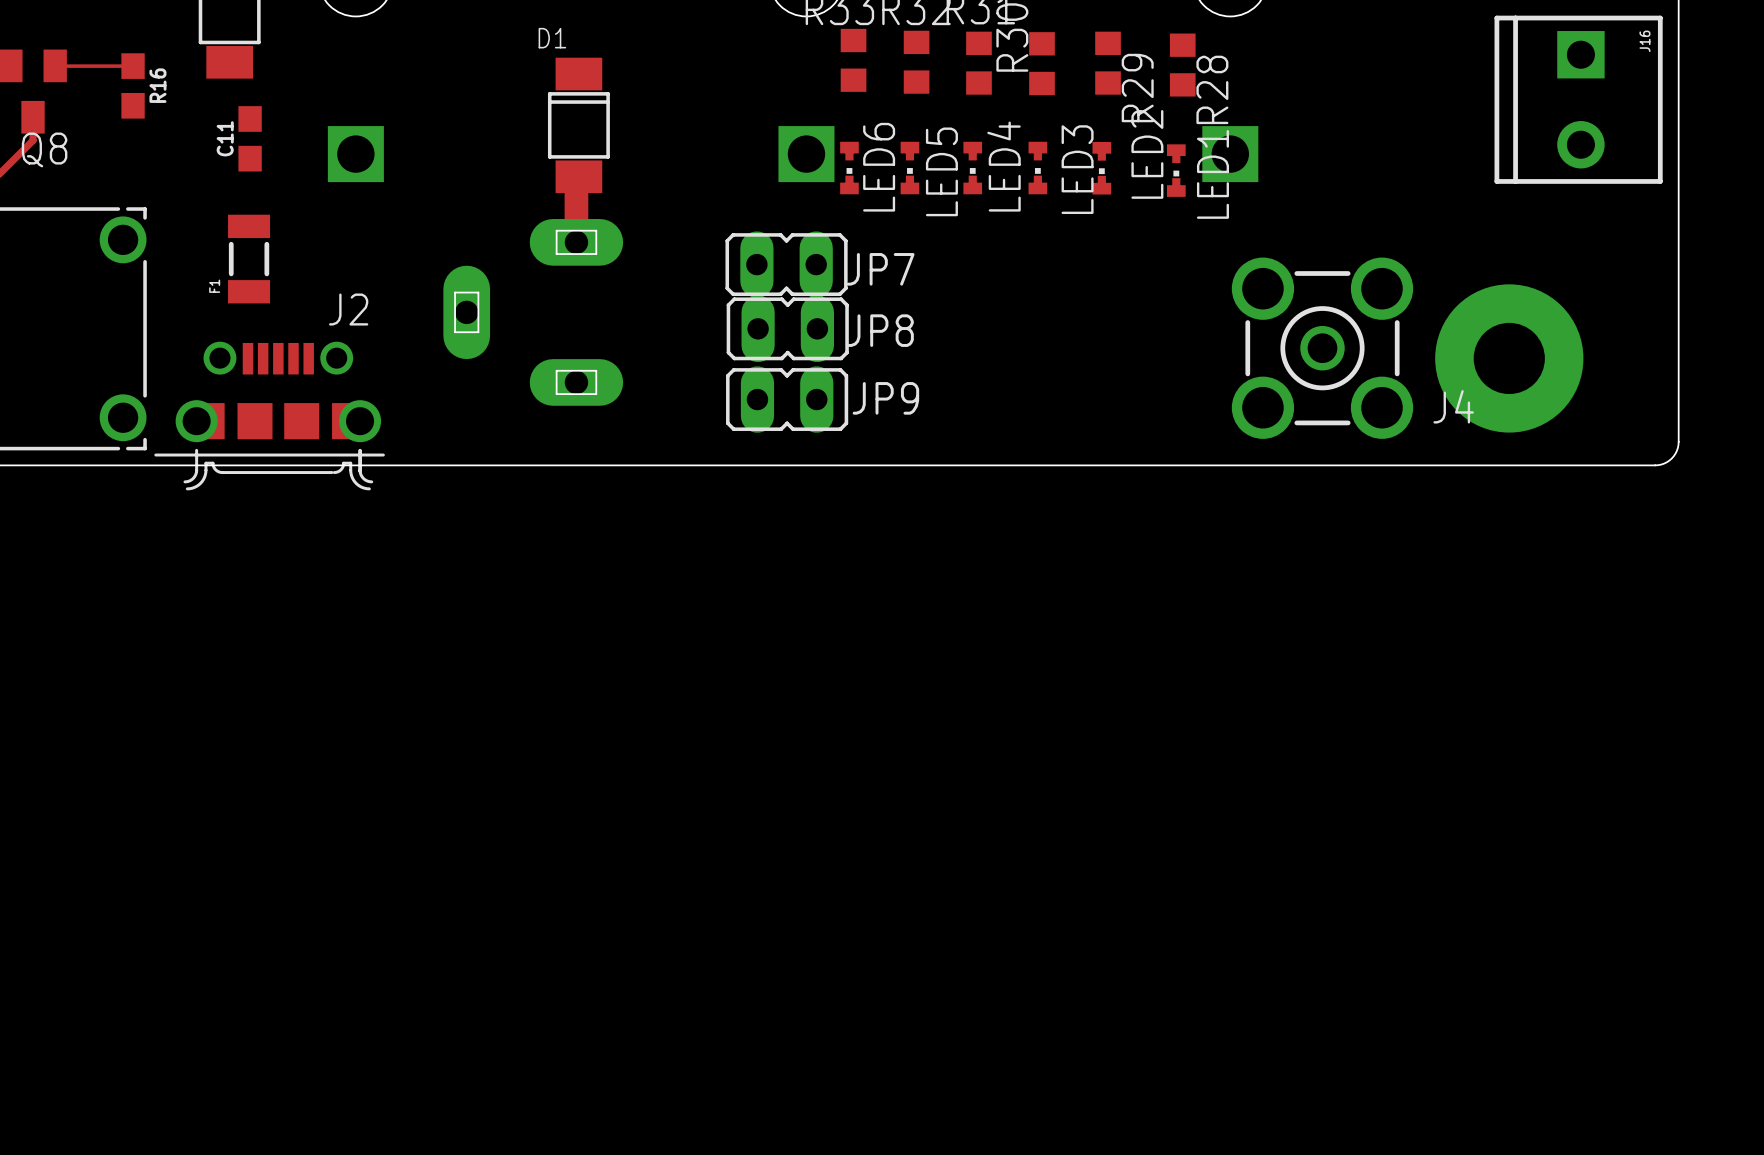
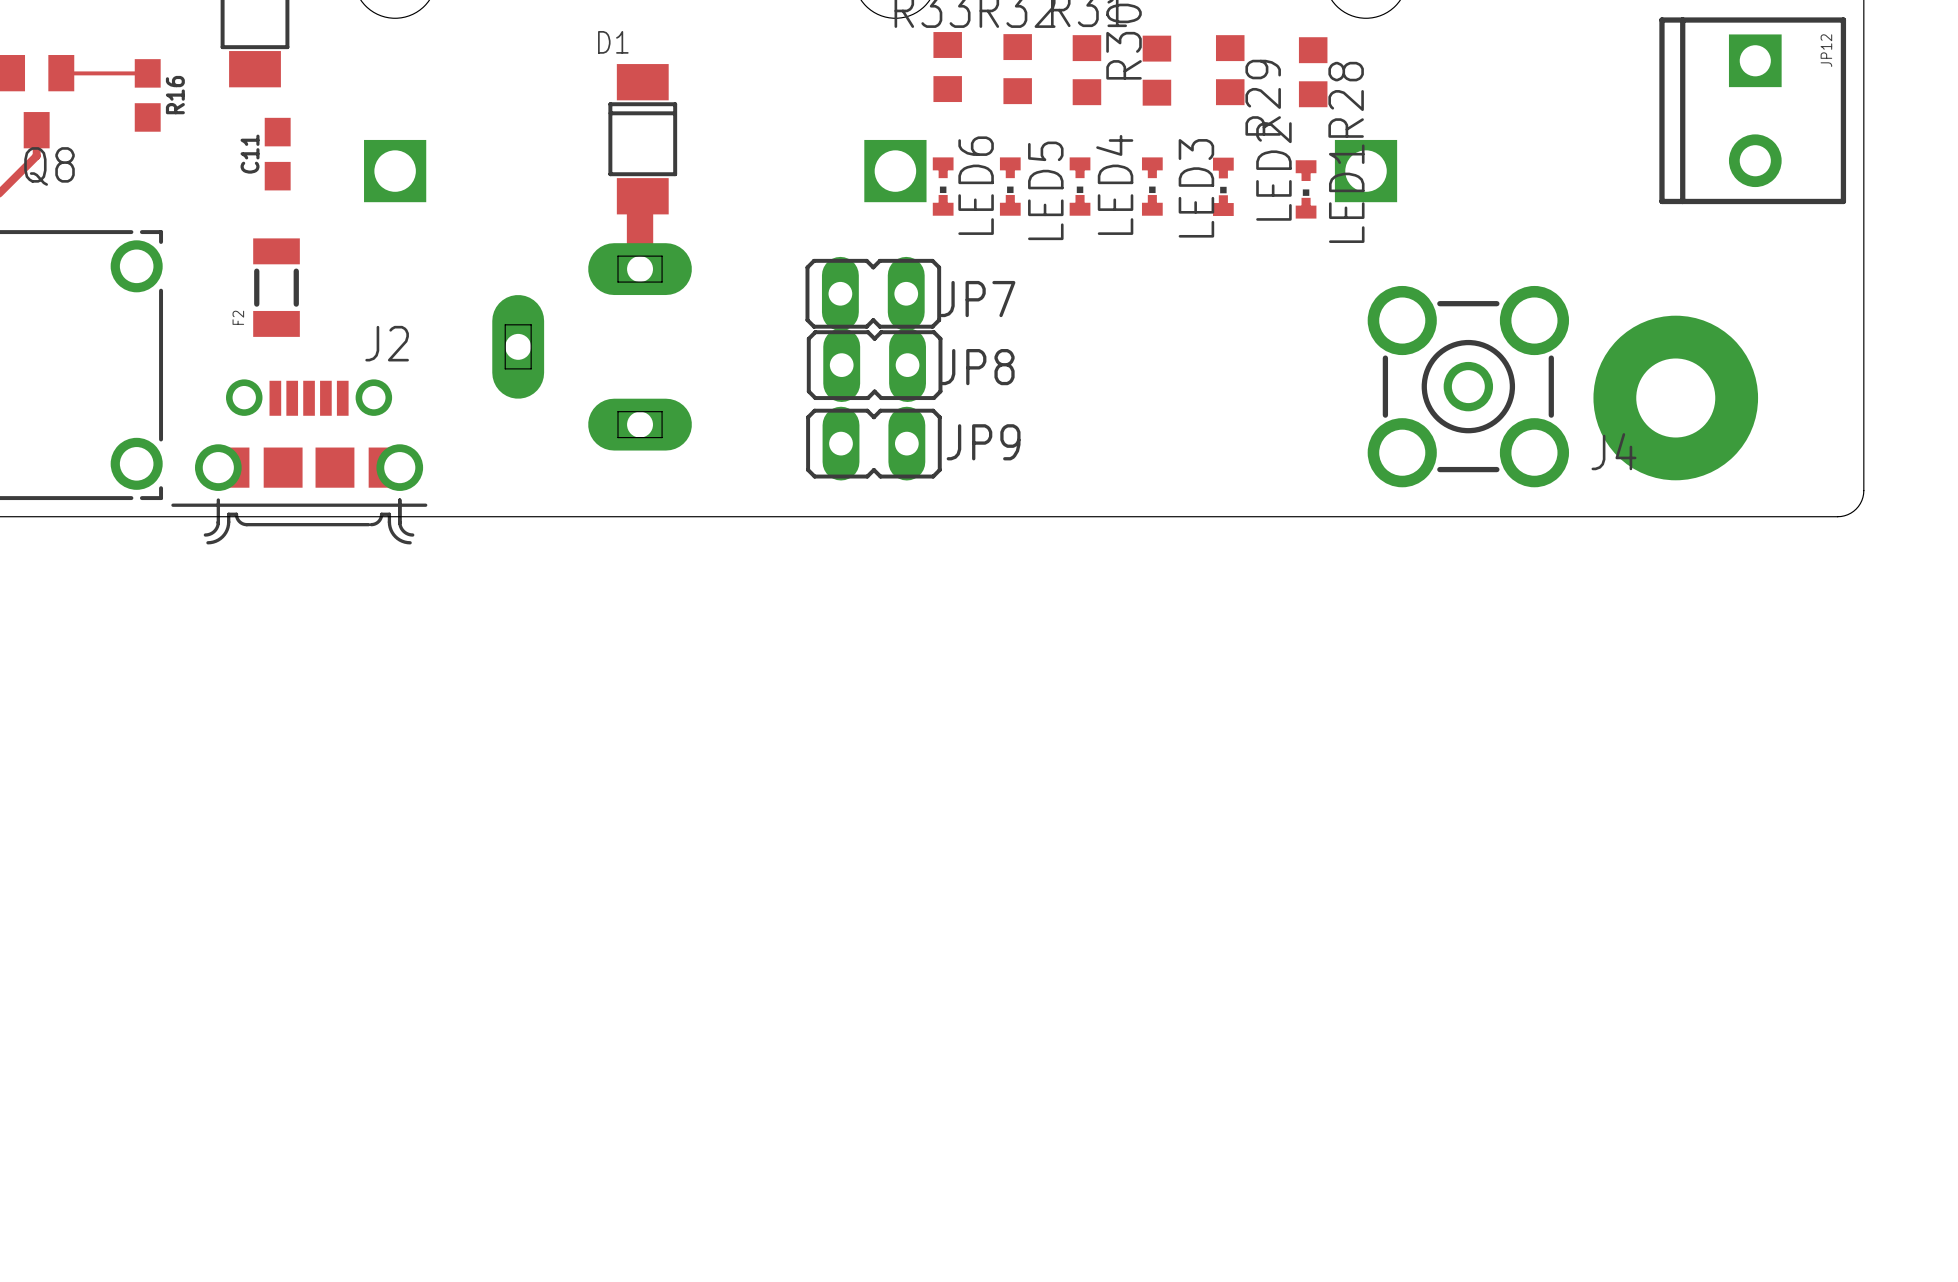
J16 name: J16 (1644, 41) -> JP12 (1826, 50)
F1 name: F1 (214, 286) -> F2 (238, 317)

